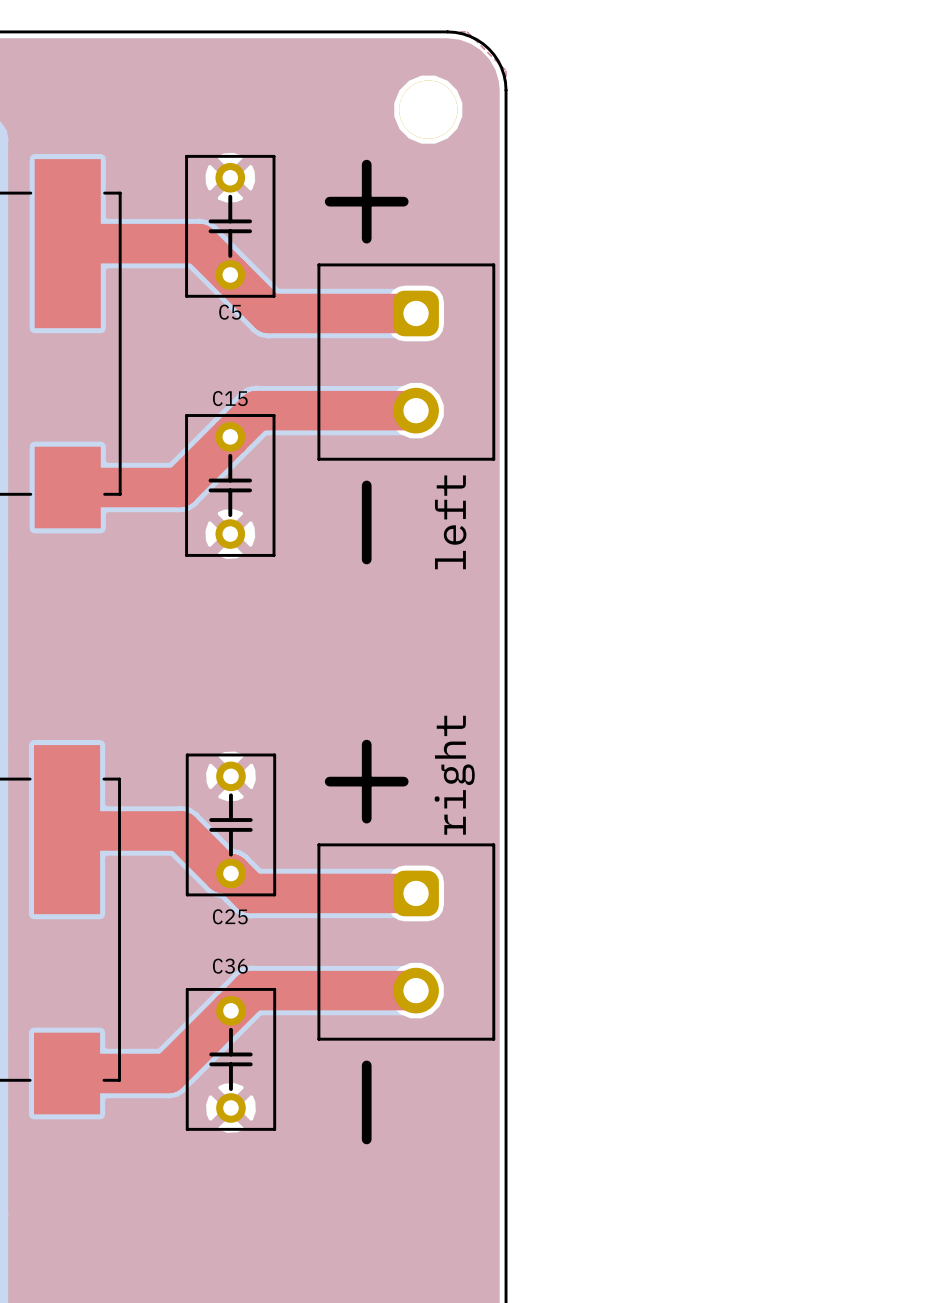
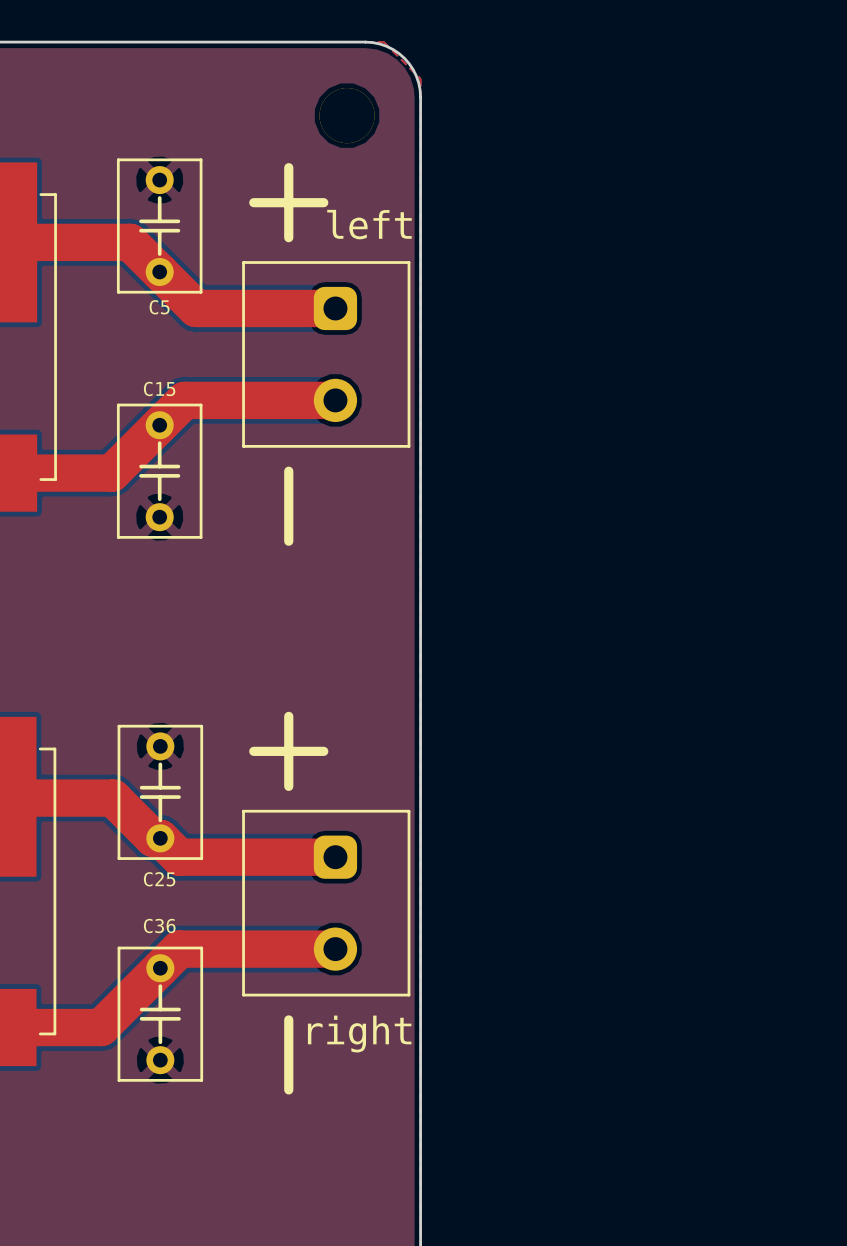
part value rotation: 0° (450, 522) -> 90° clockwise (369, 224)
part value position: left (450, 522) -> left (369, 224)
part value rotation: 0° (454, 775) -> 90° clockwise (359, 1034)
part value position: right (454, 775) -> right (359, 1034)

